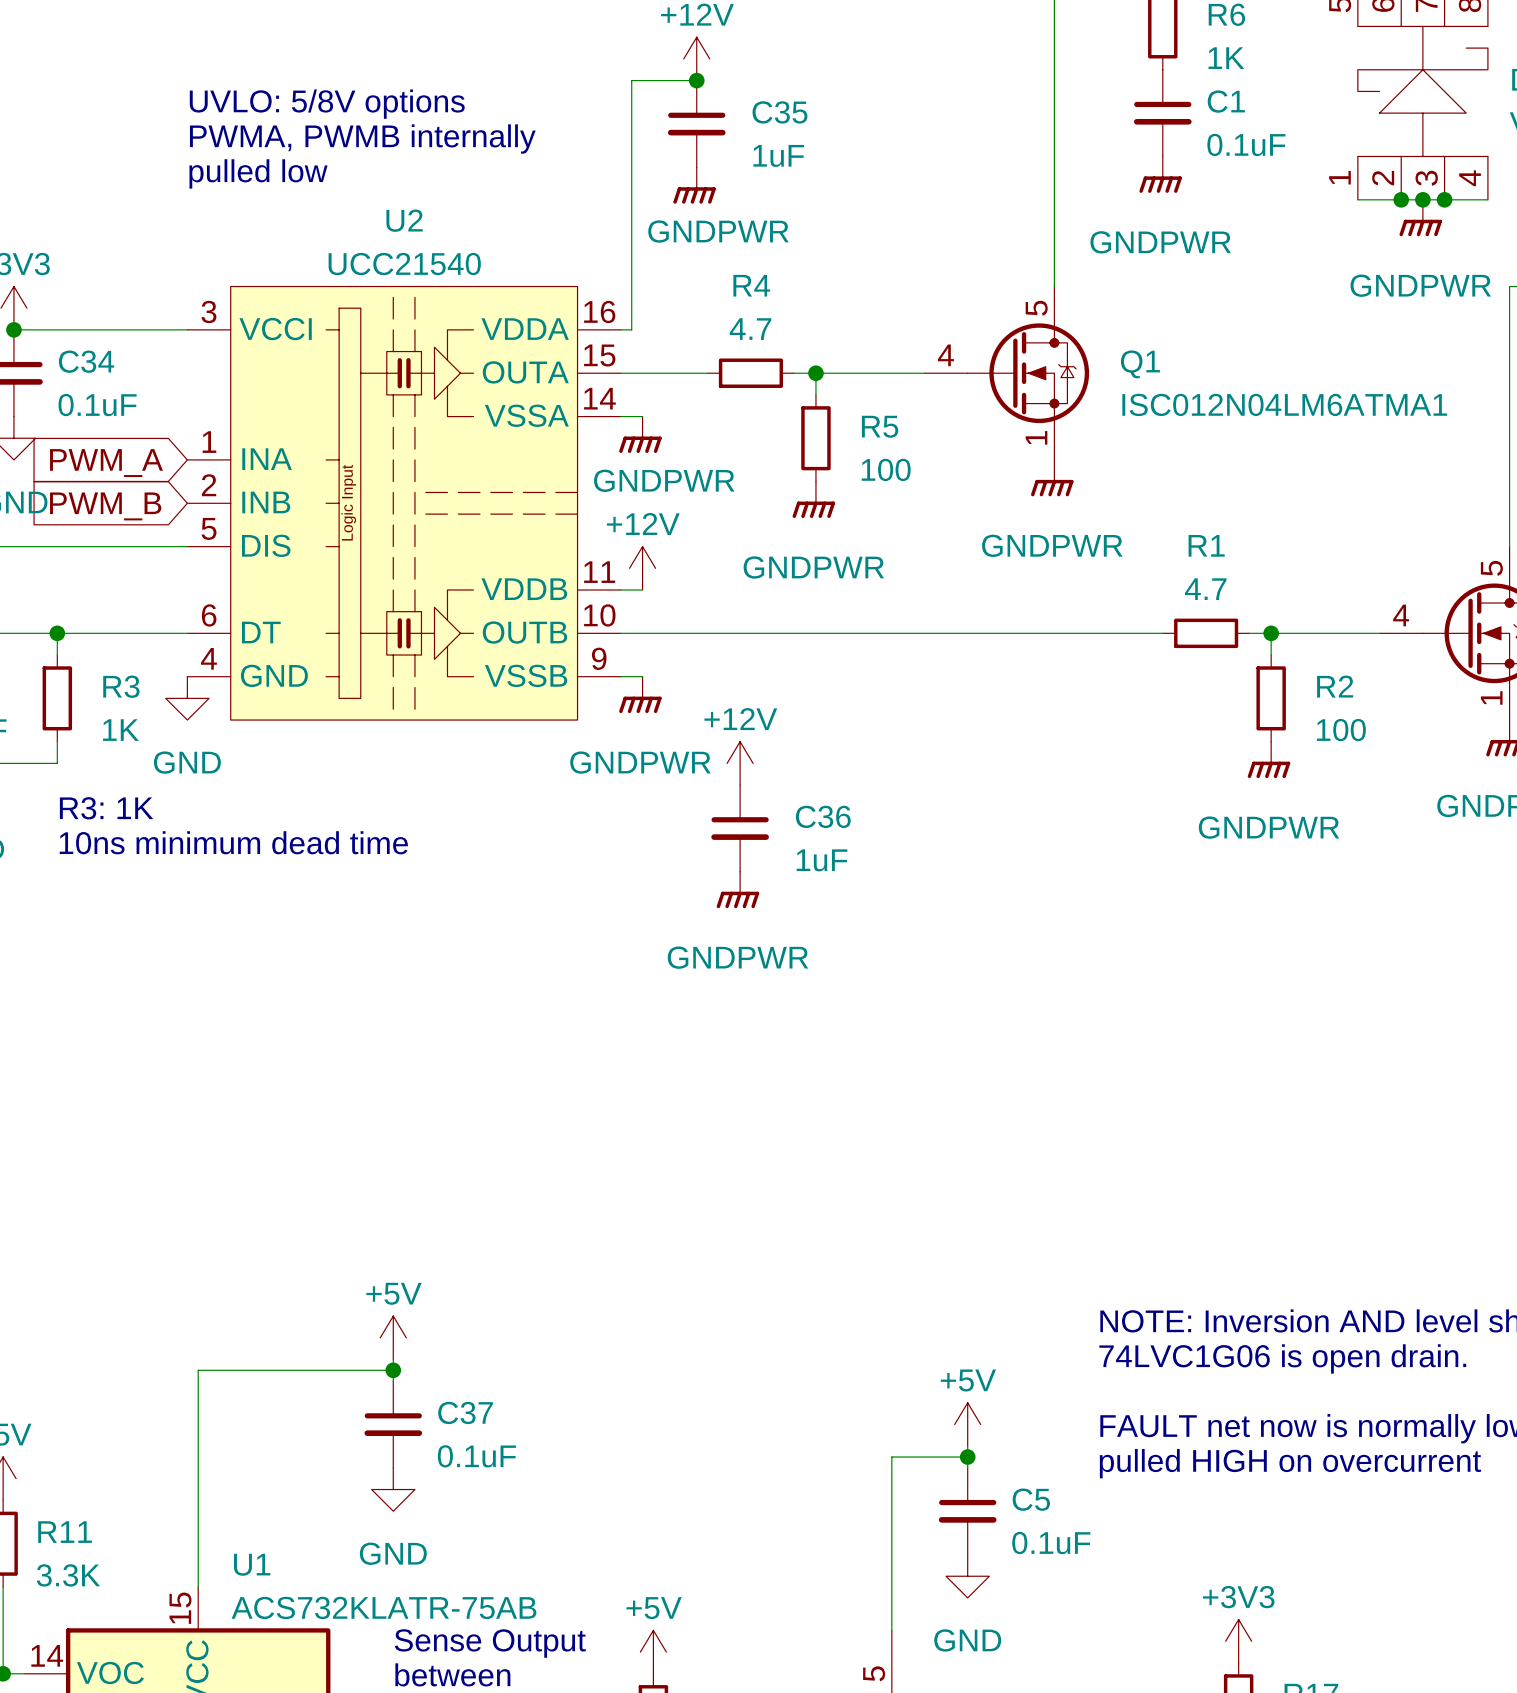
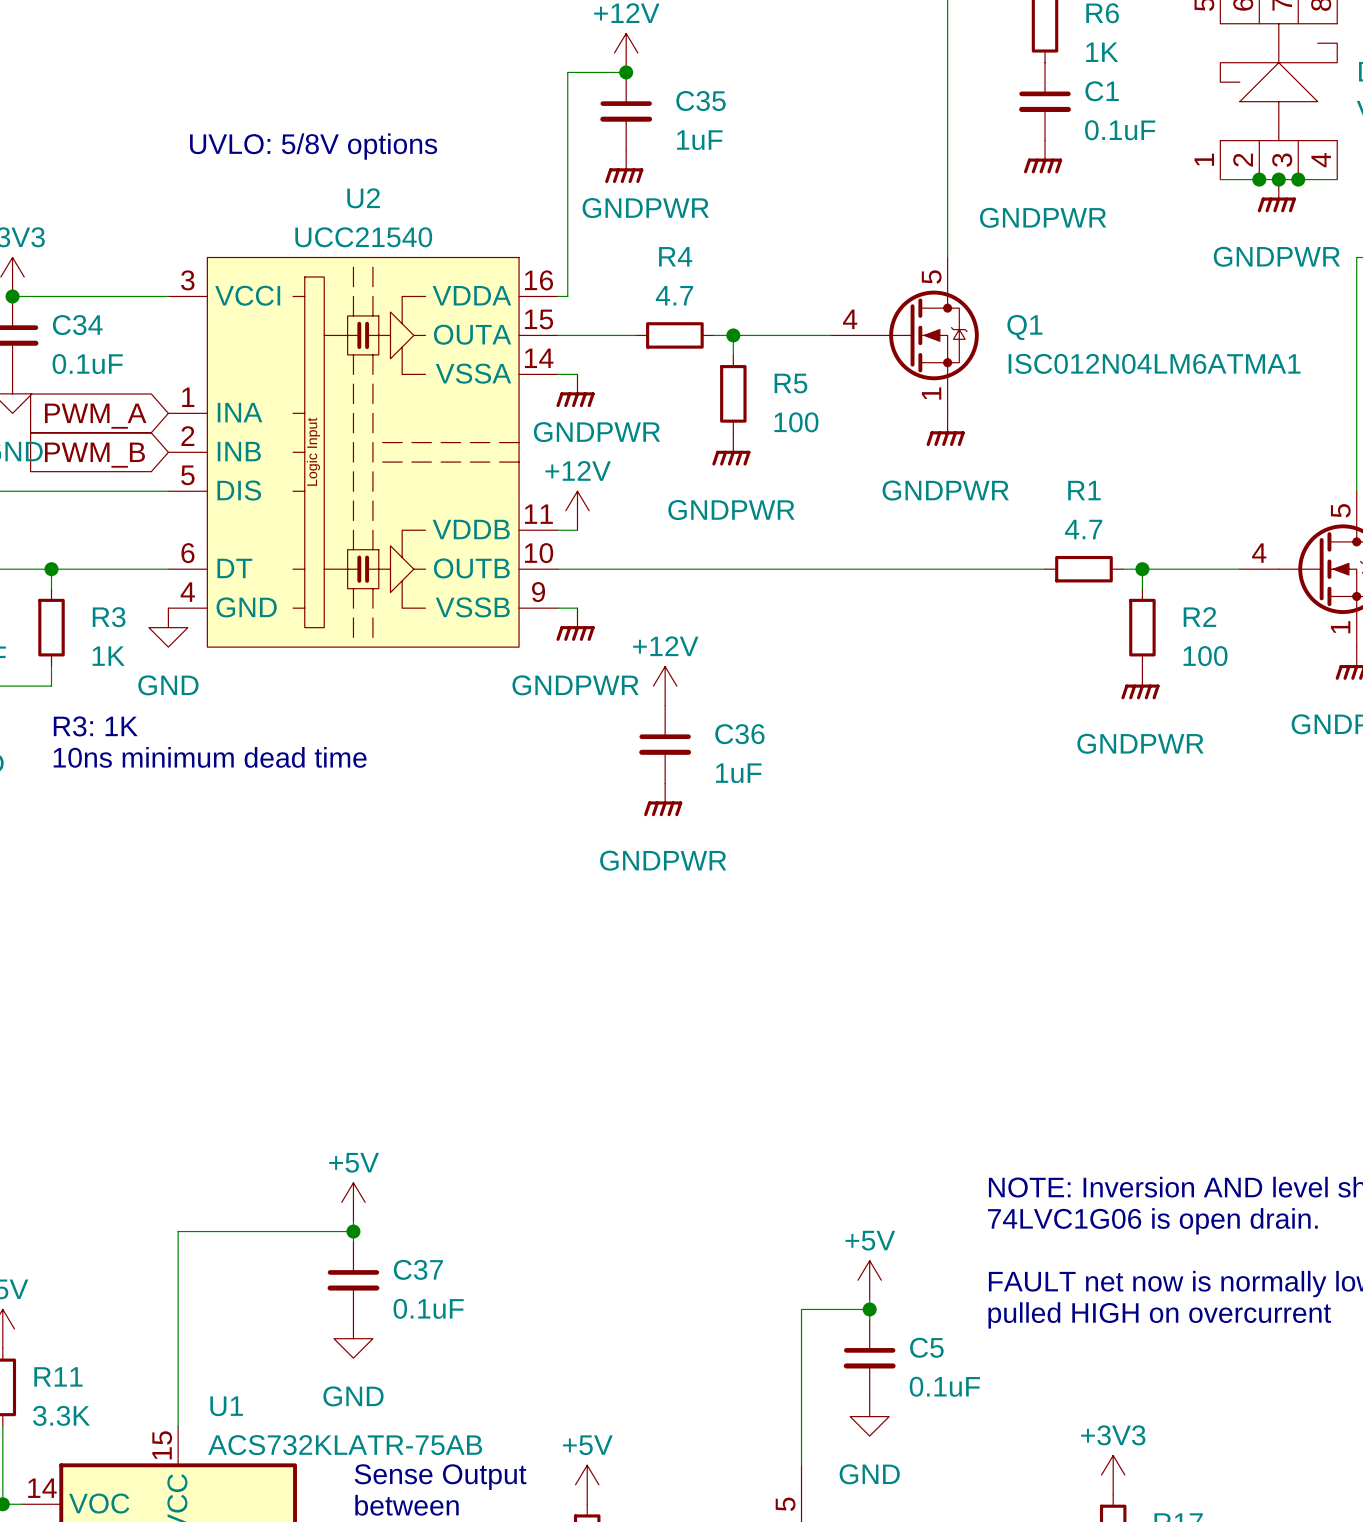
text position: UVLO: 5/8V options (327, 104) -> UVLO: 5/8V options (313, 146)
text: PWMA, PWMB internally (362, 139) -> none
text: pulled low (258, 173) -> none

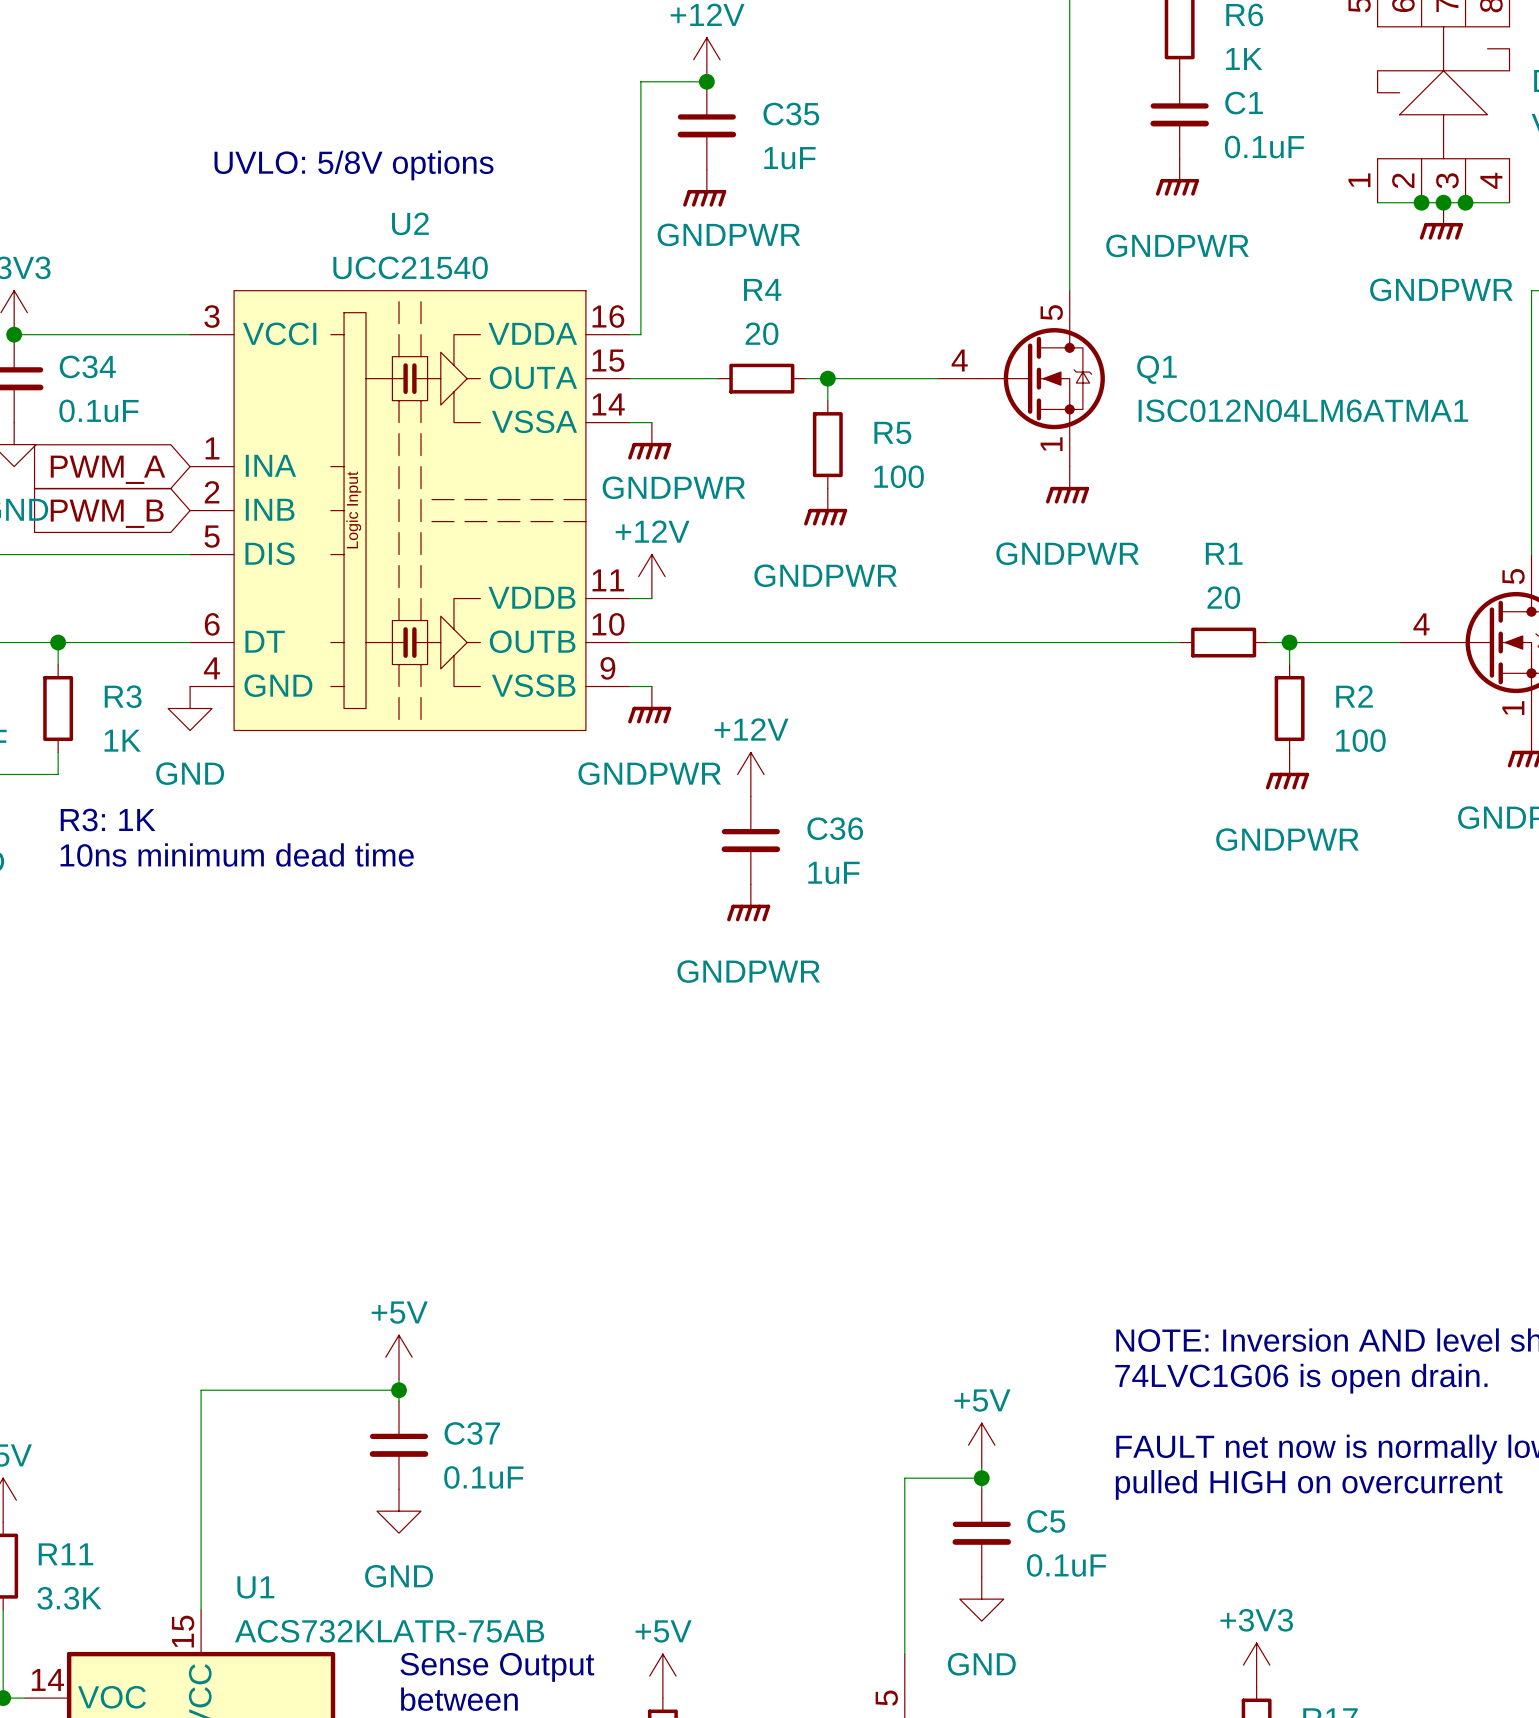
R4 value: 4.7 (674, 295) -> 20 (762, 333)
R1 value: 4.7 (1083, 529) -> 20 (1223, 597)

